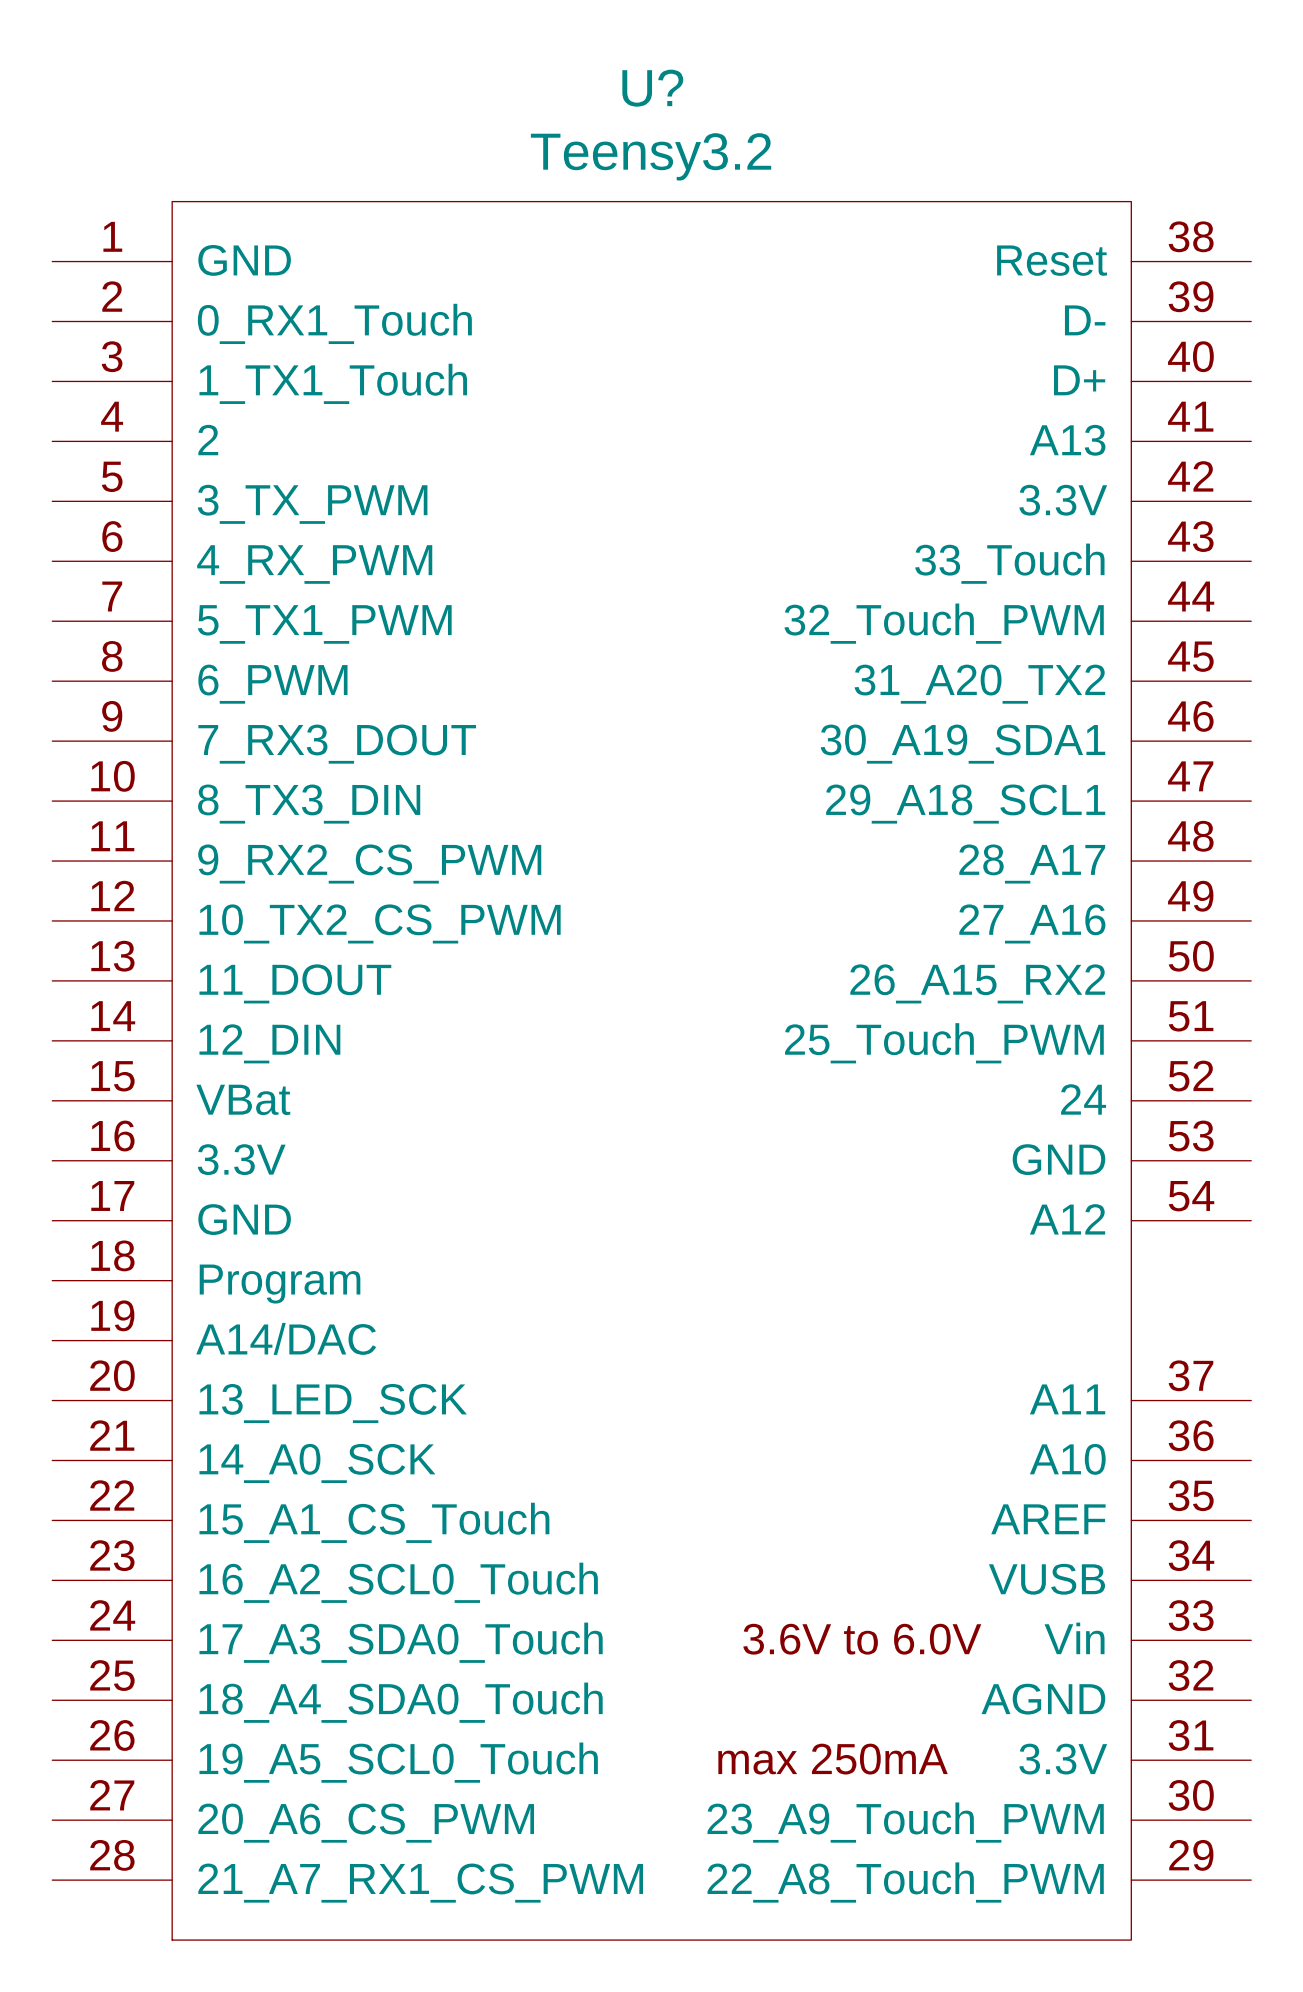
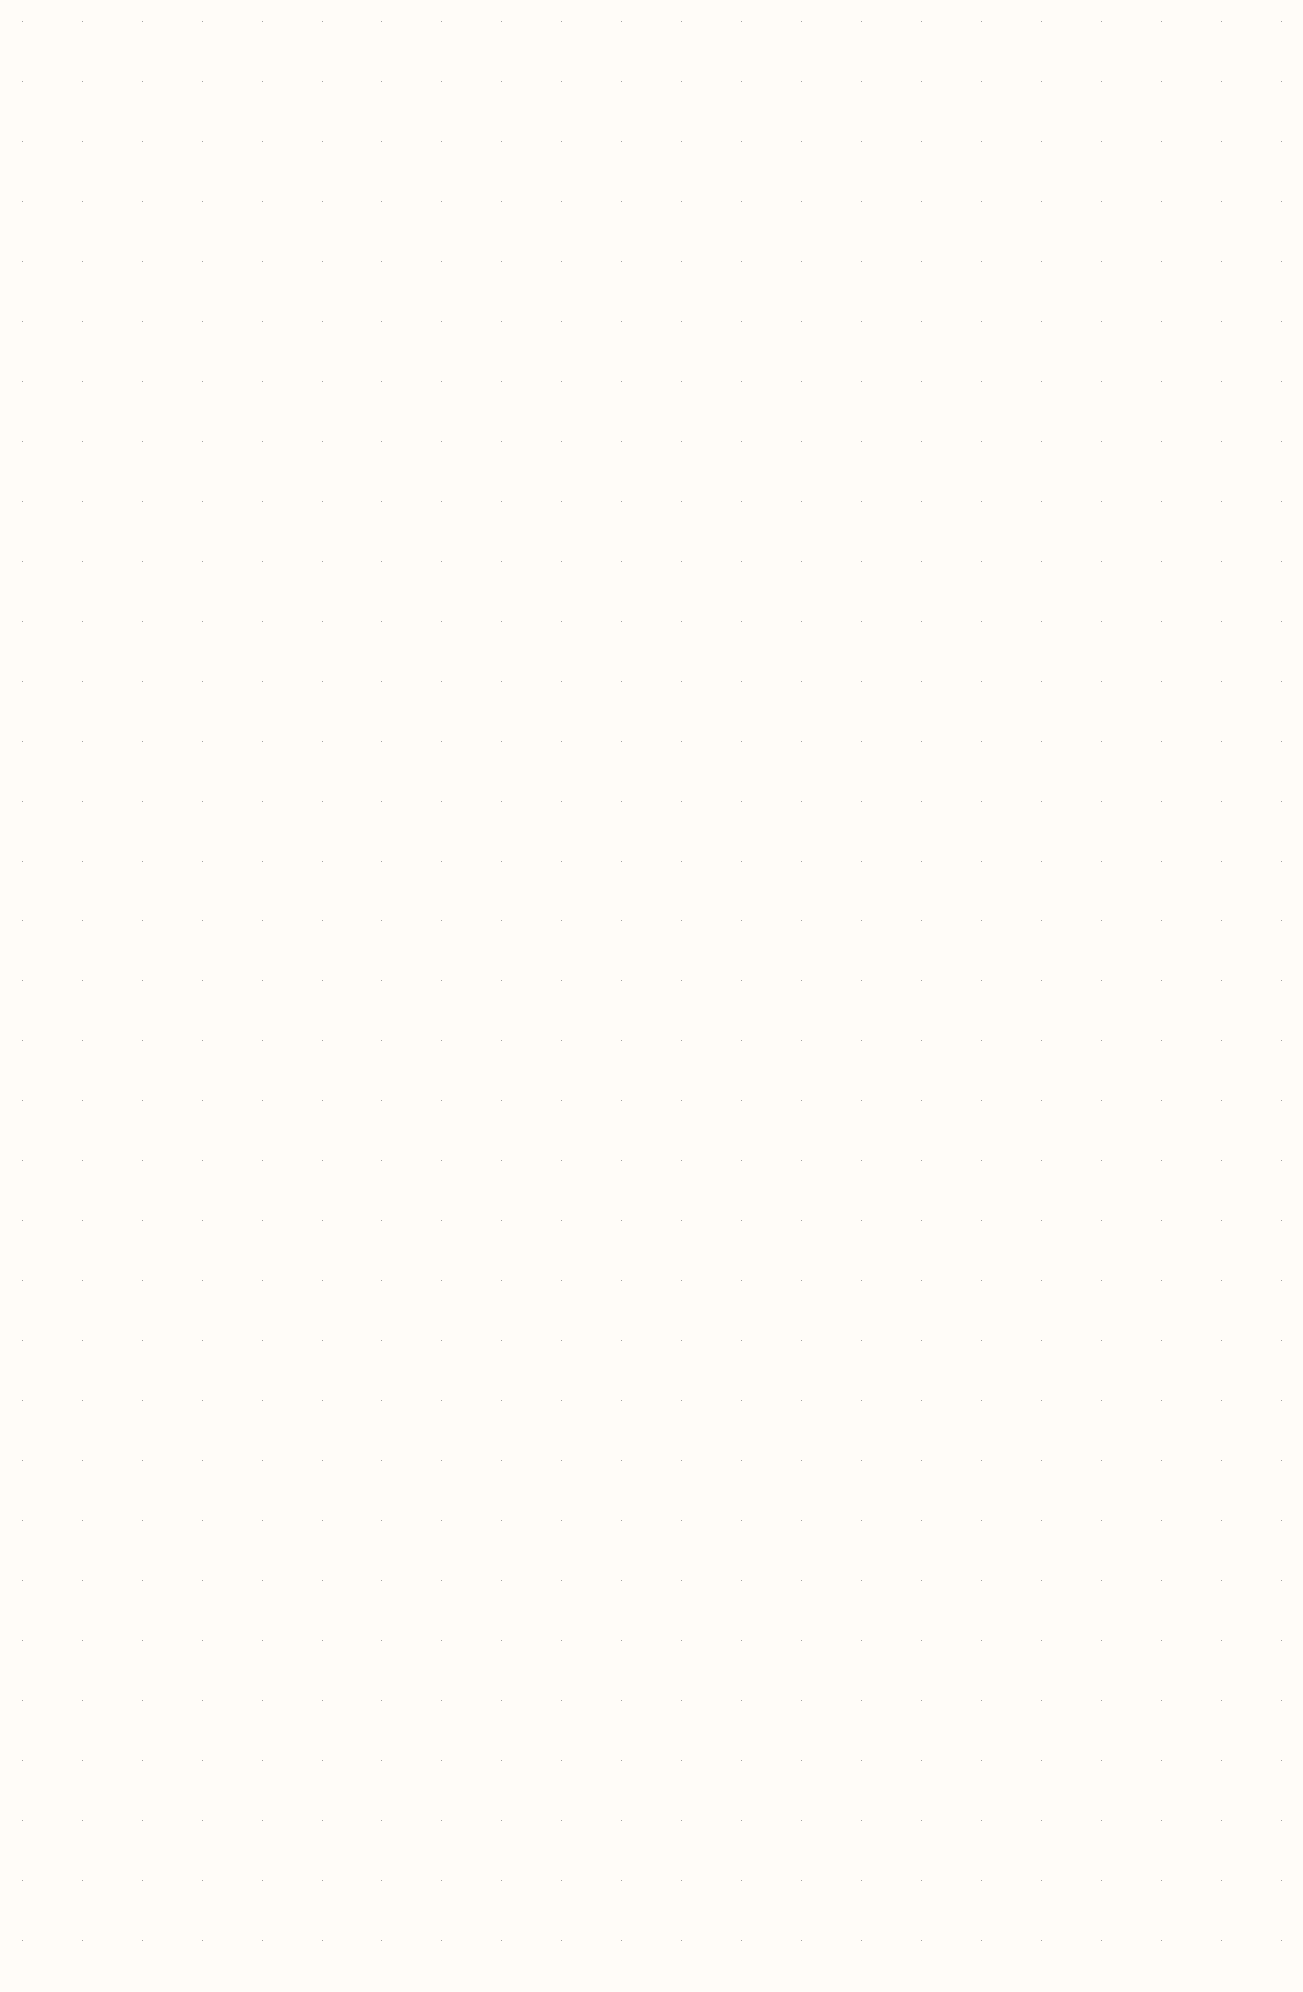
U?: Teensy3.2 (651, 1070) -> none

